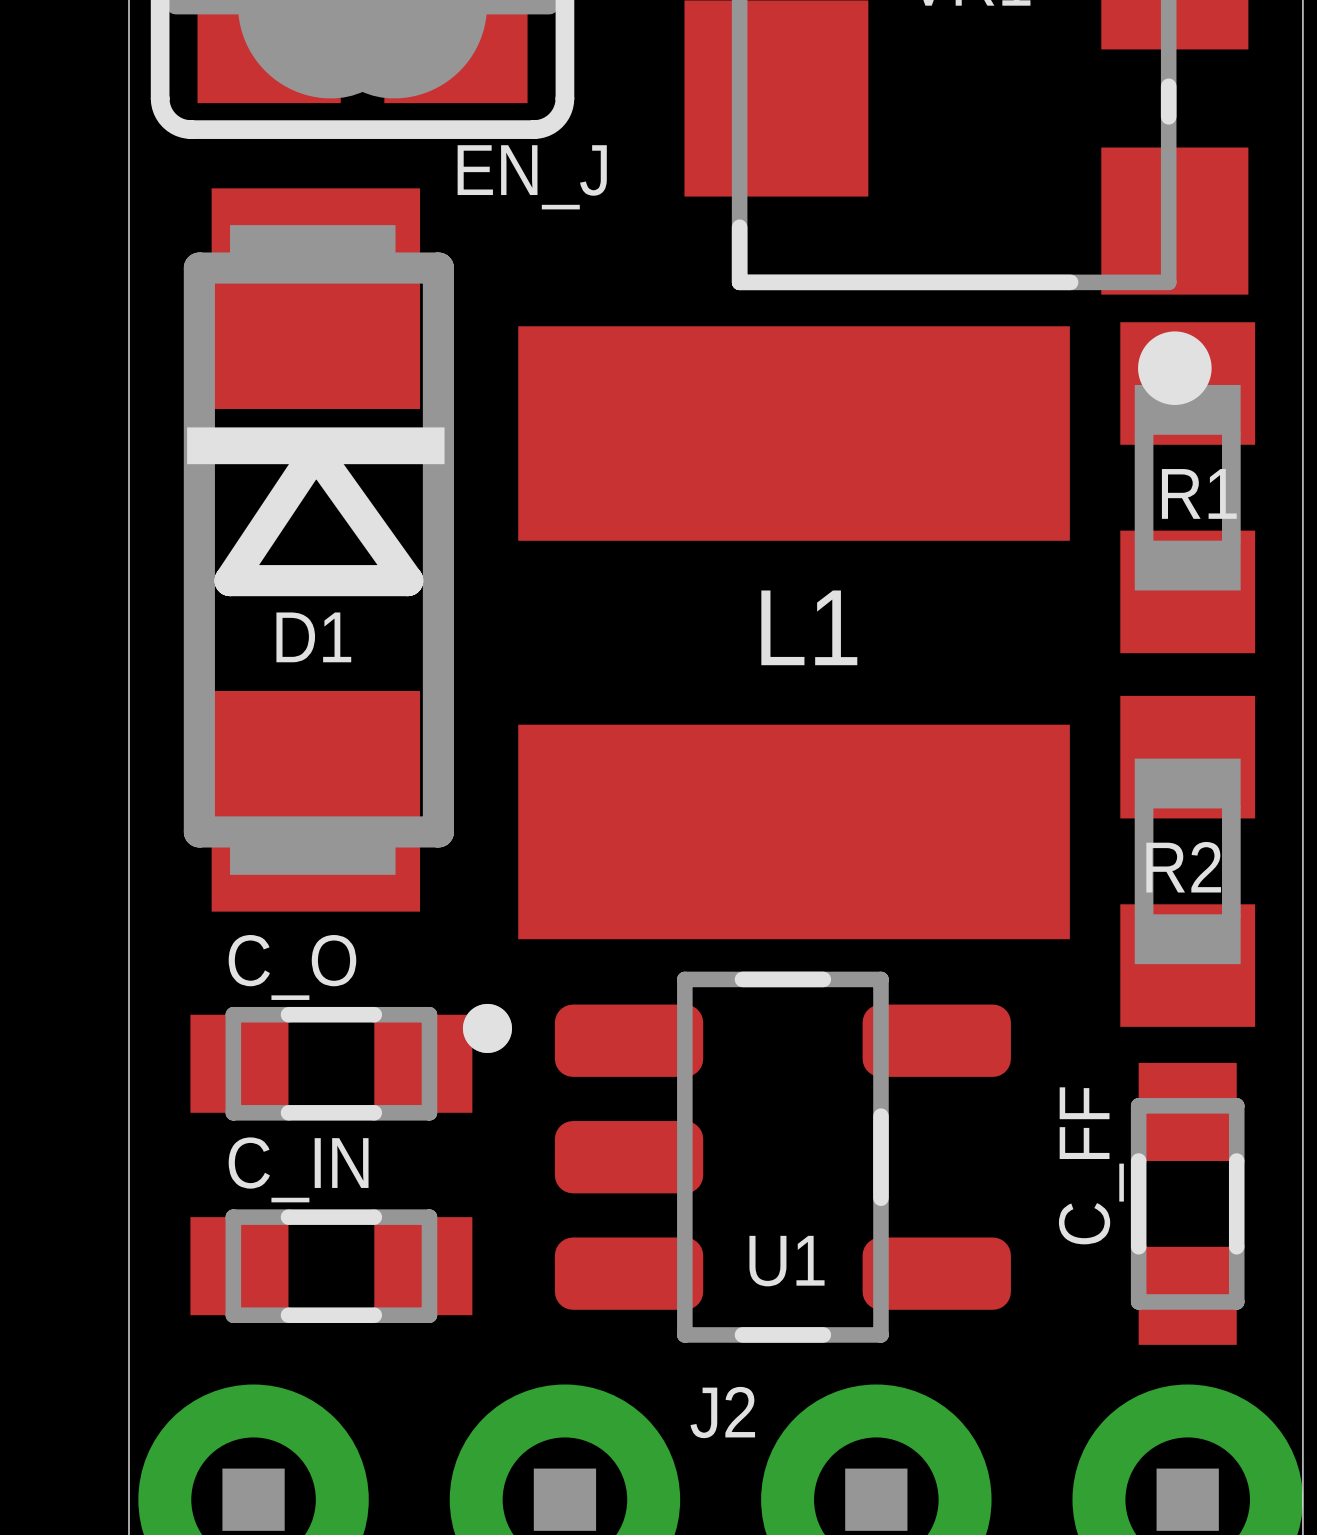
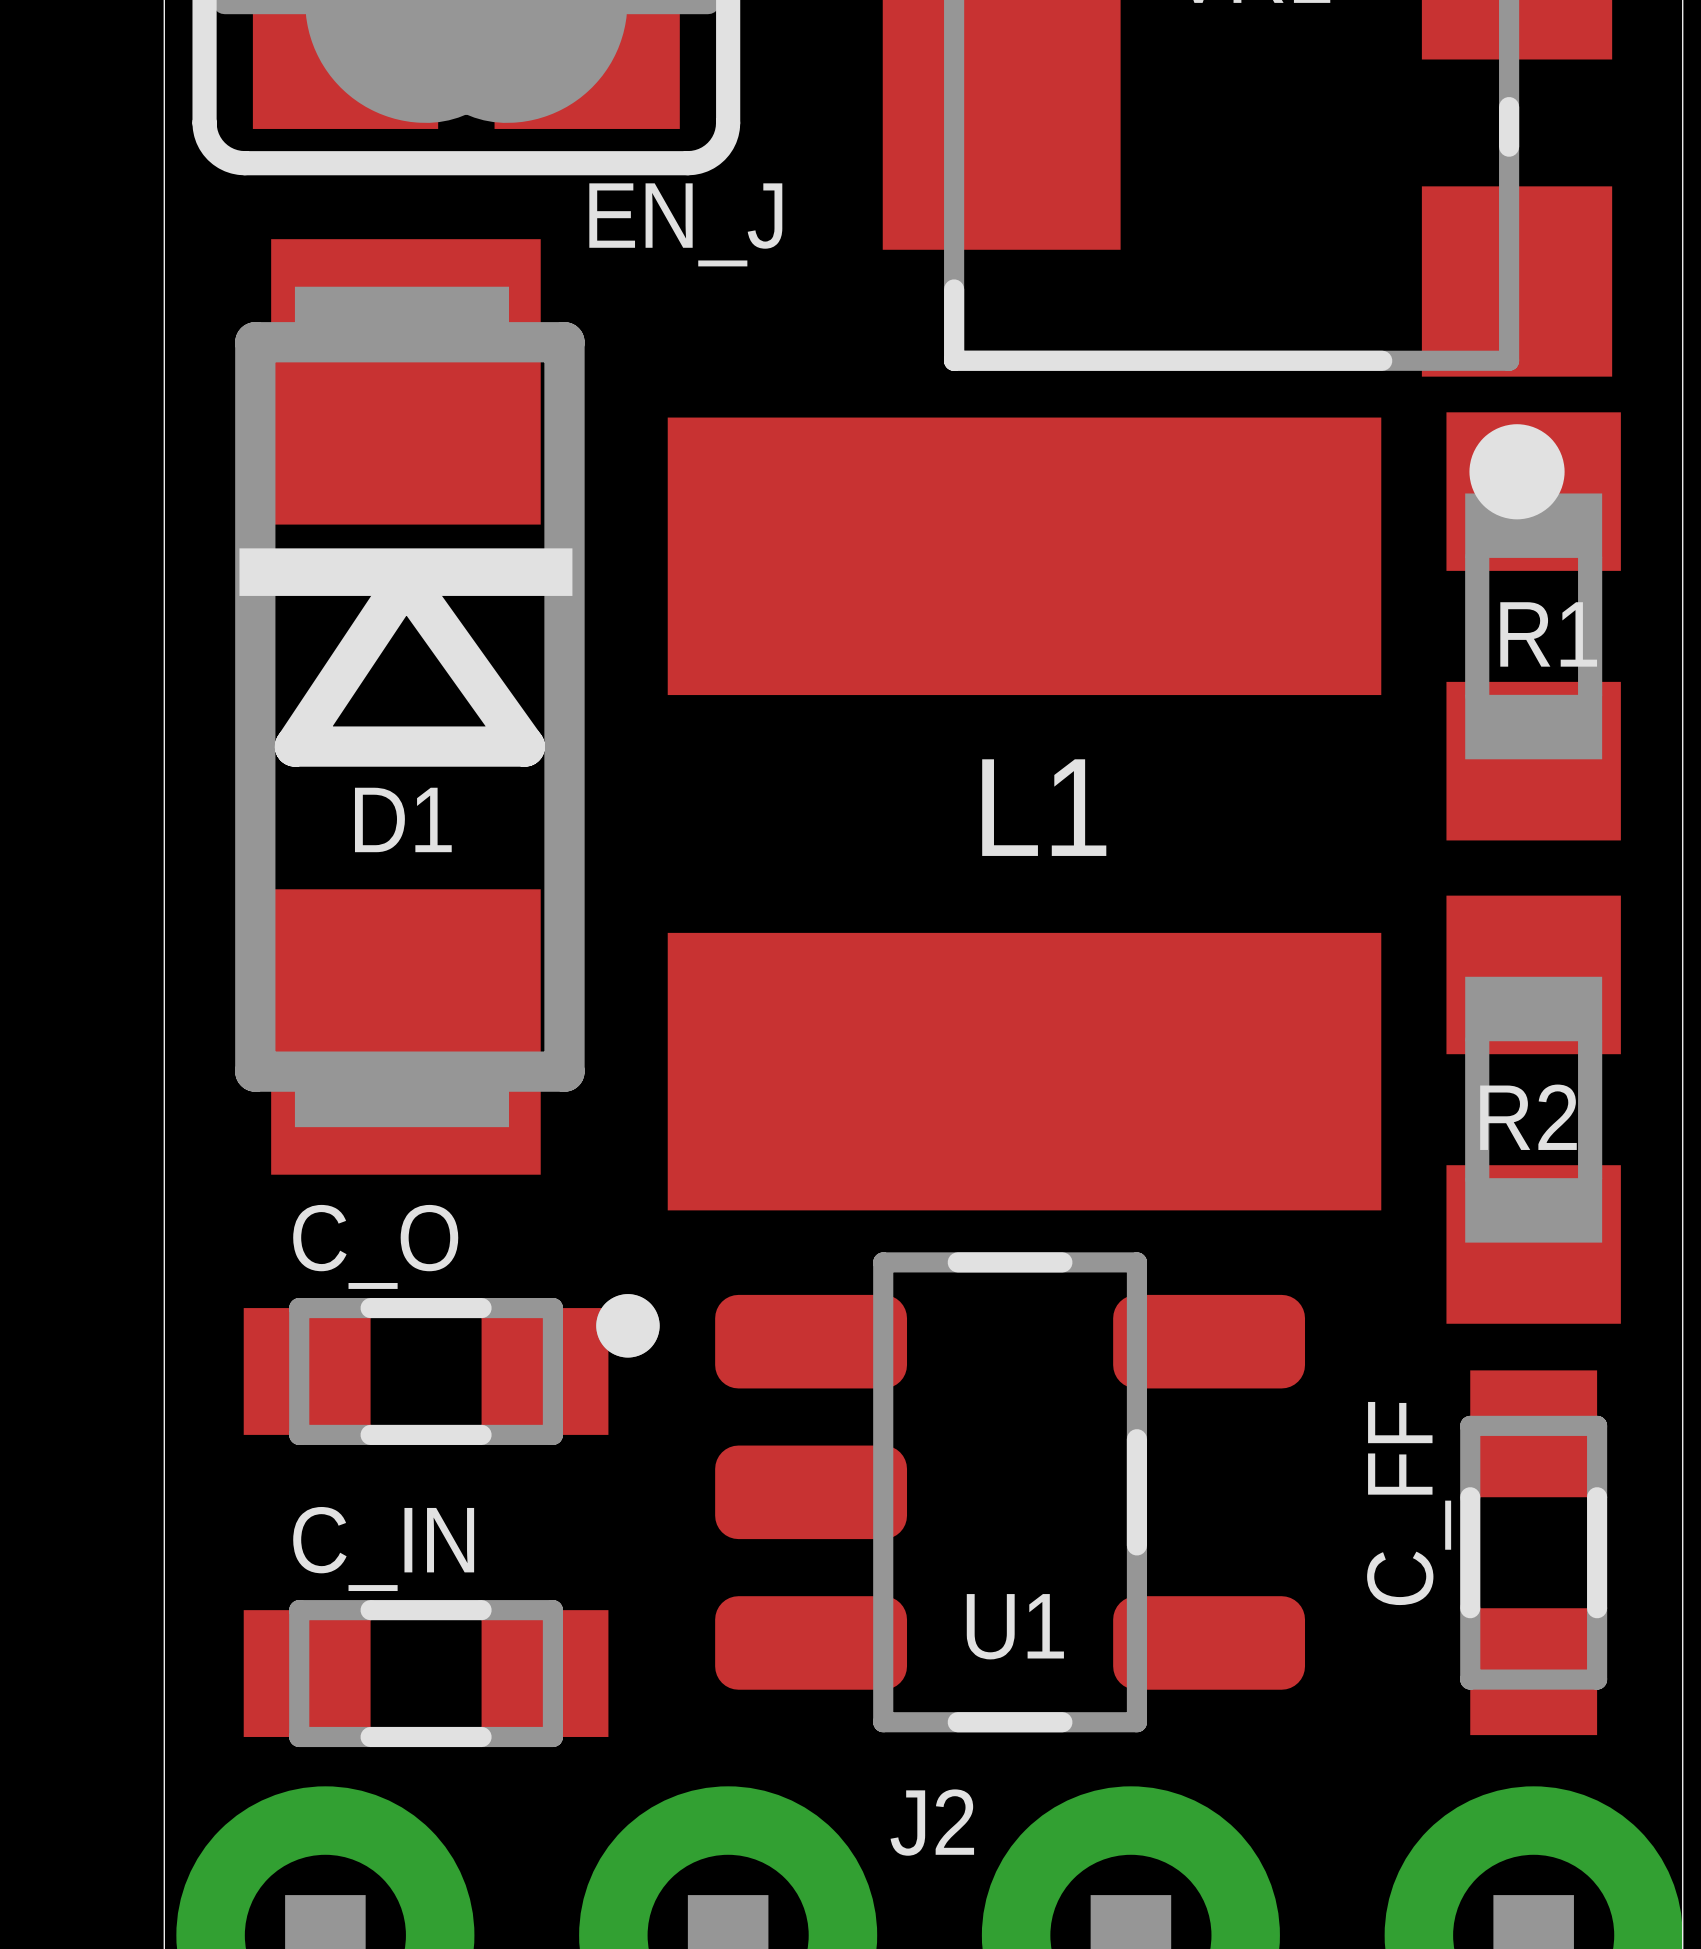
C_IN position: (331, 1266) -> (426, 1673)

